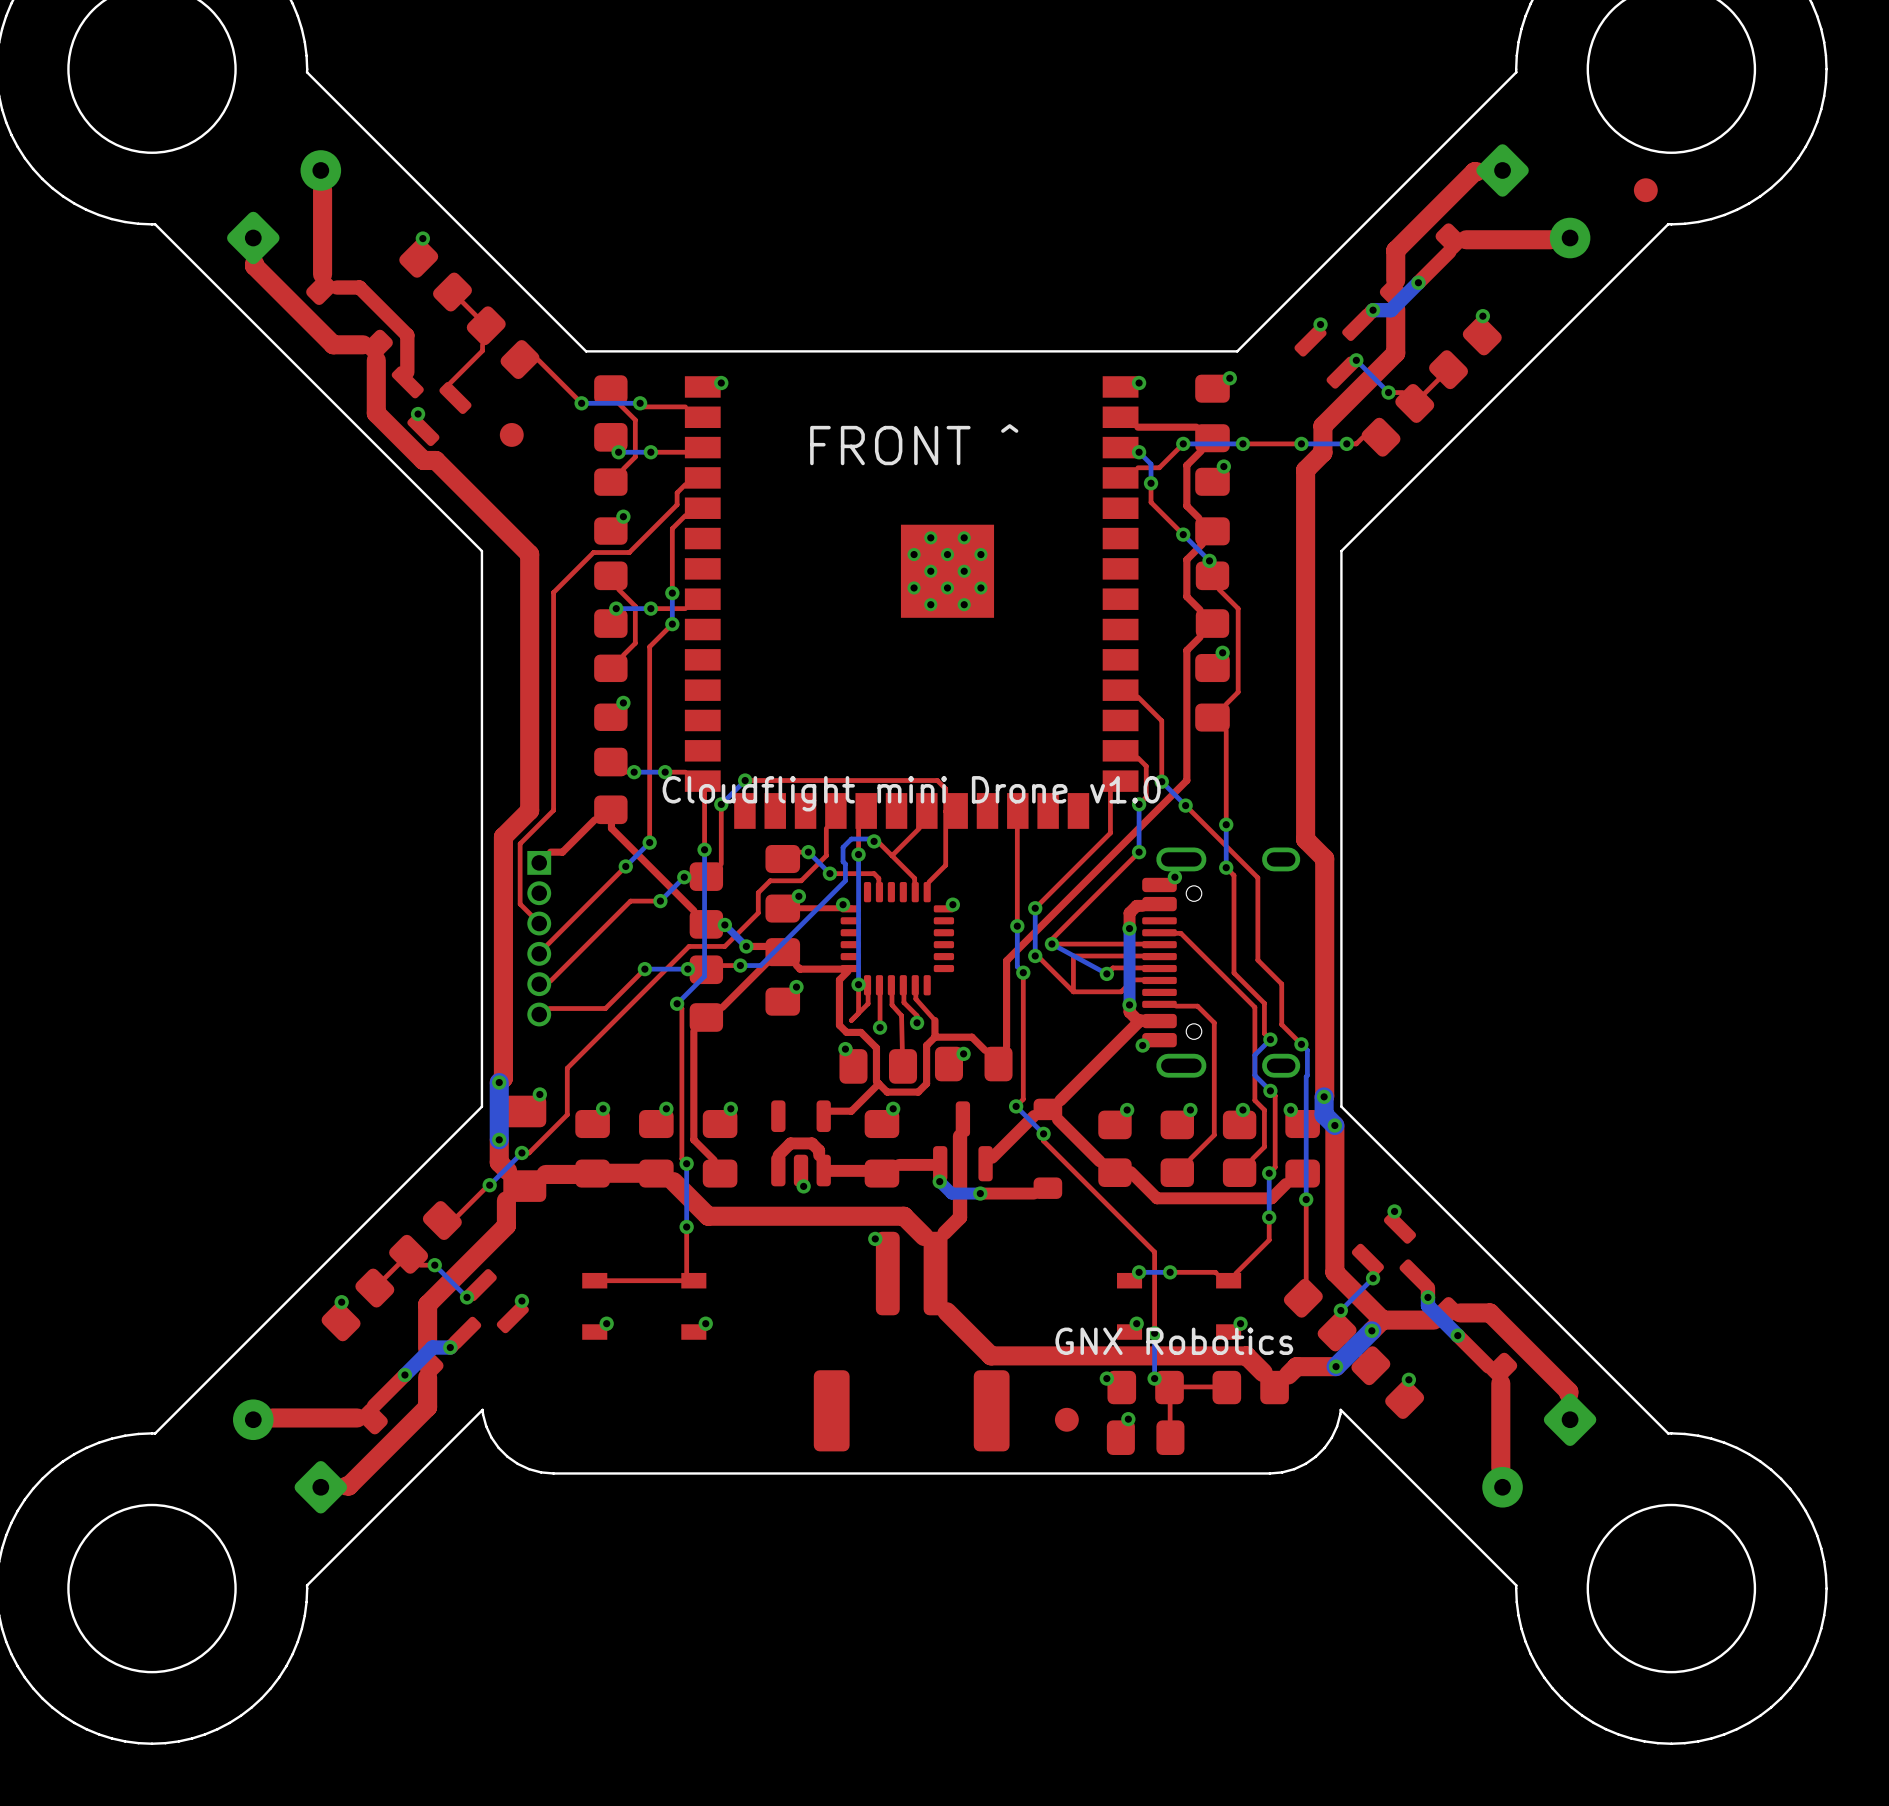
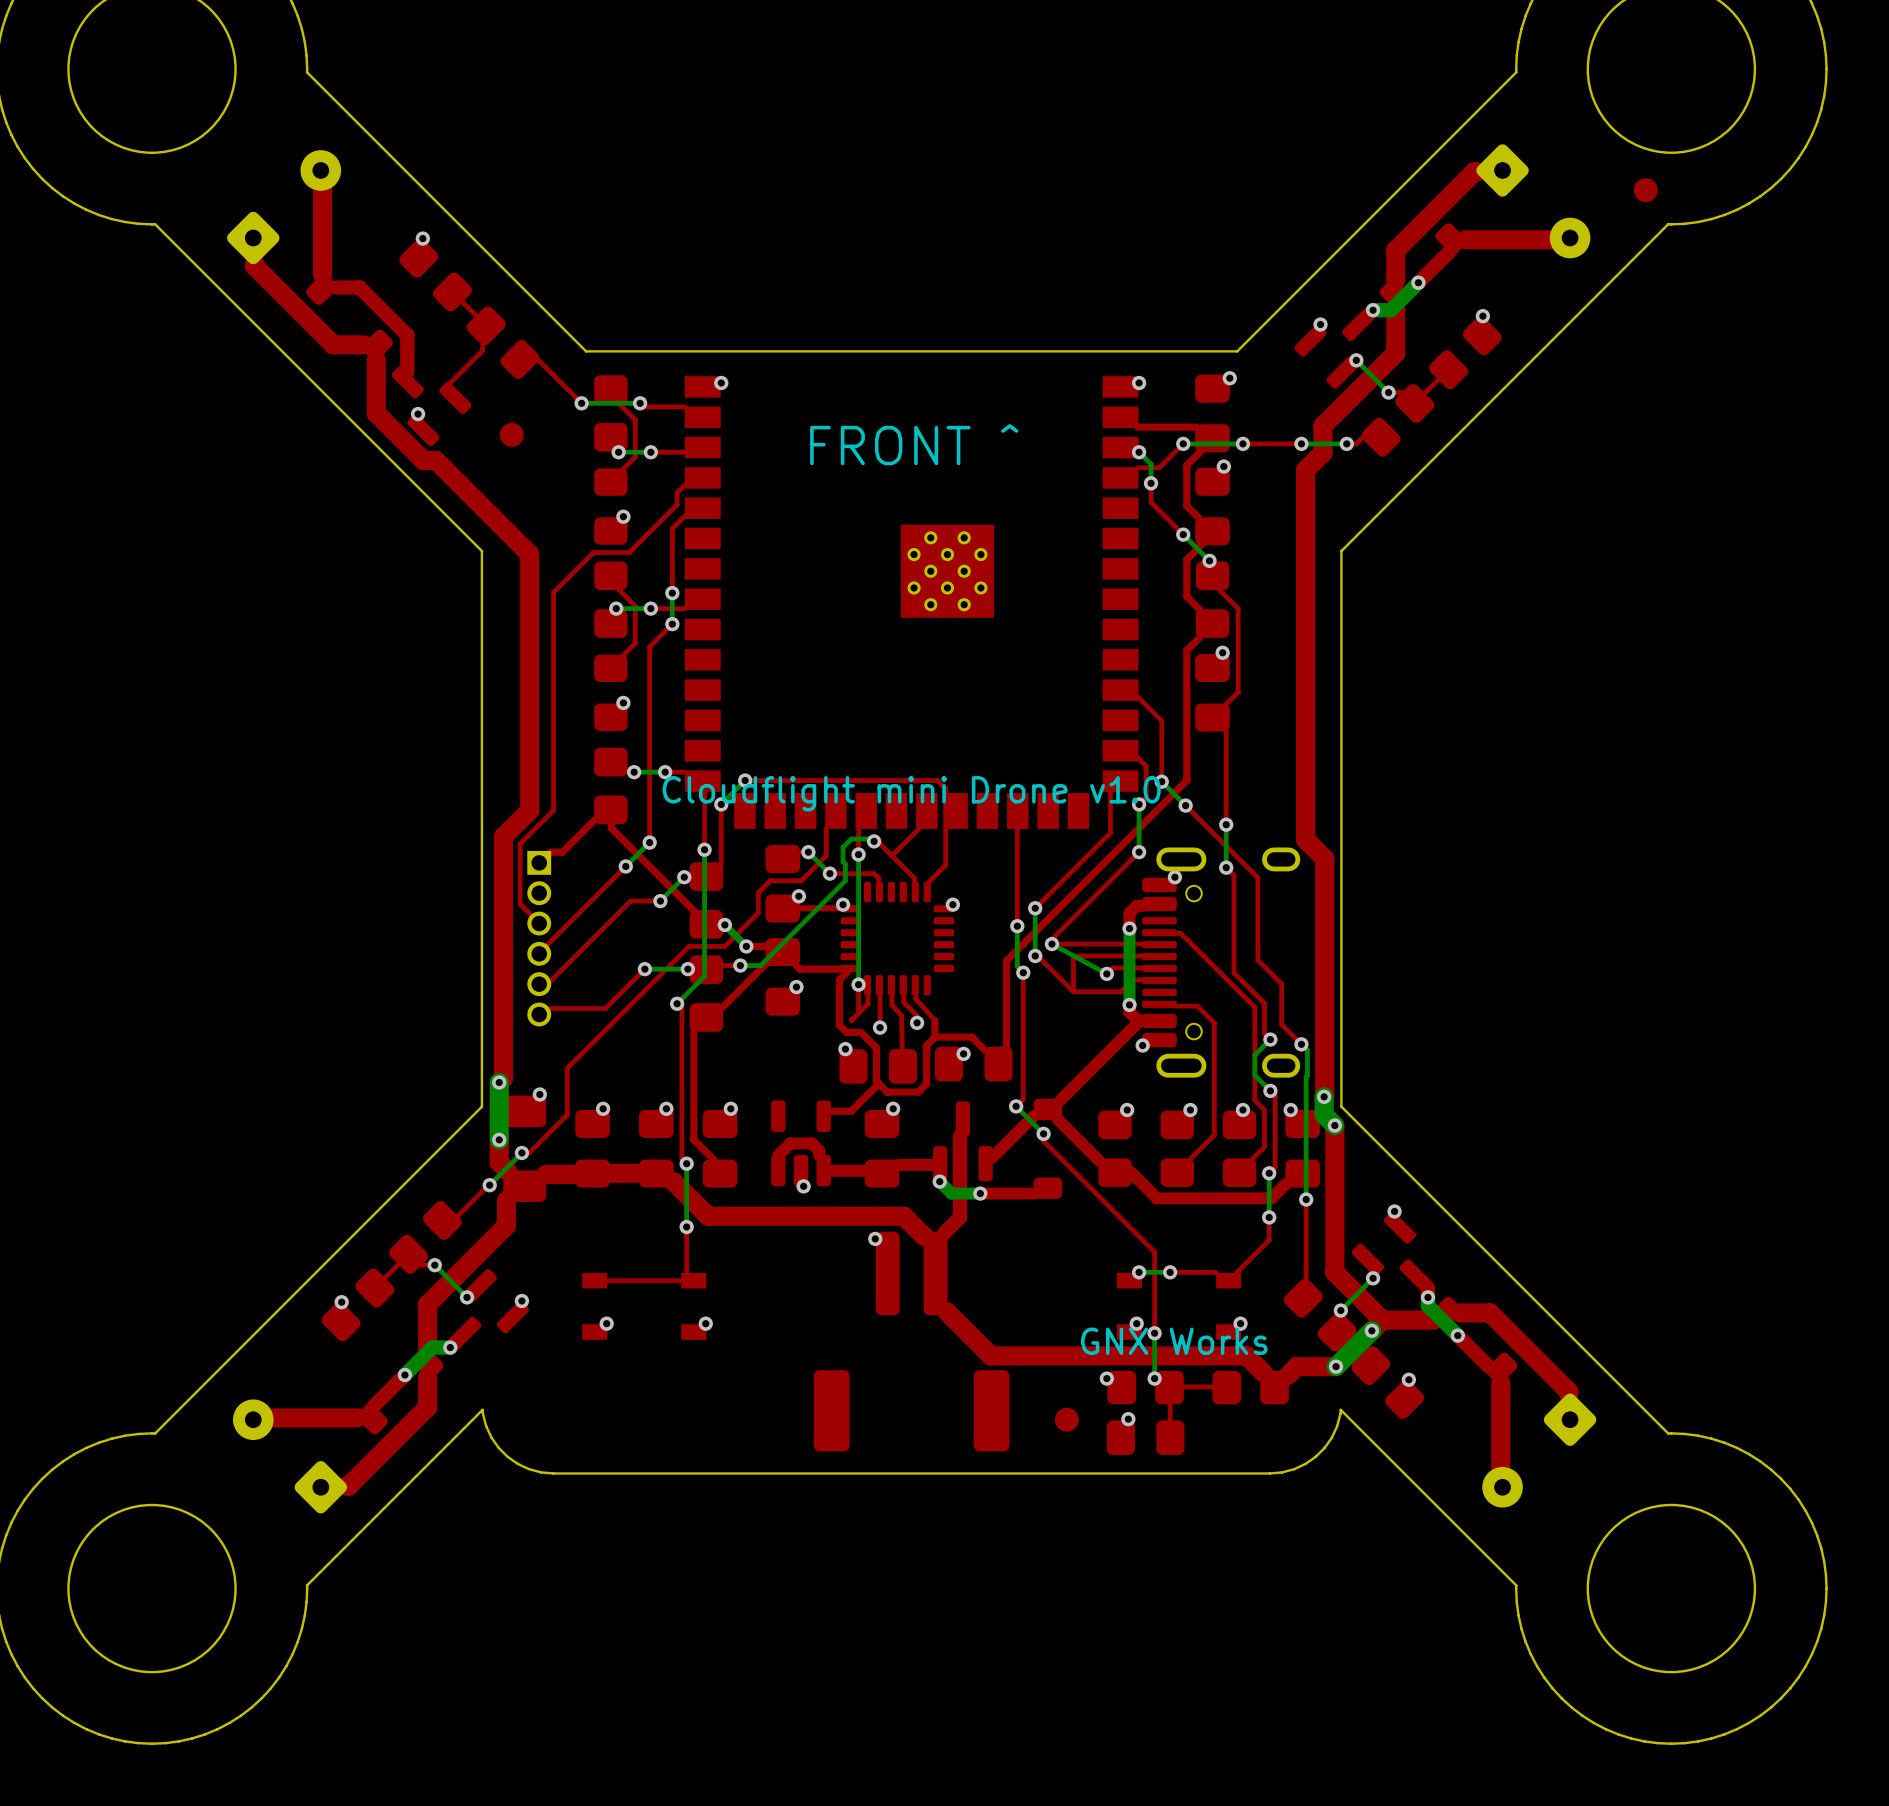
text: GNX Robotics (1174, 1341) -> GNX Works (1174, 1341)

